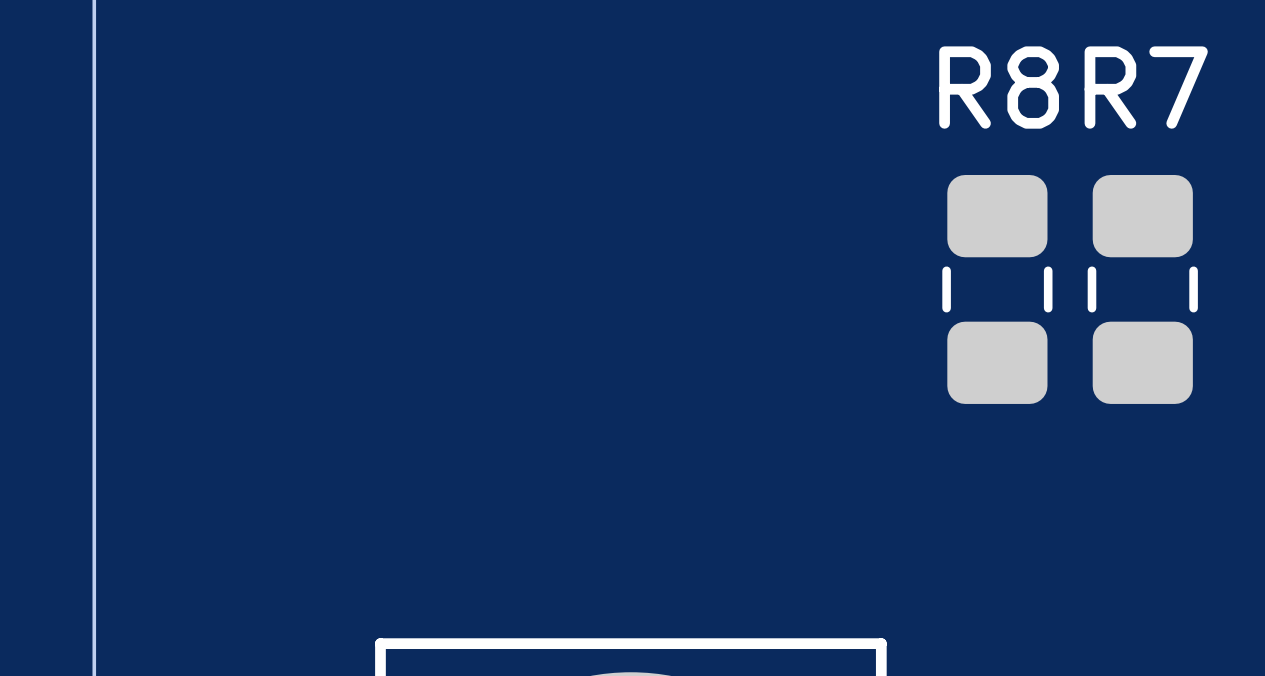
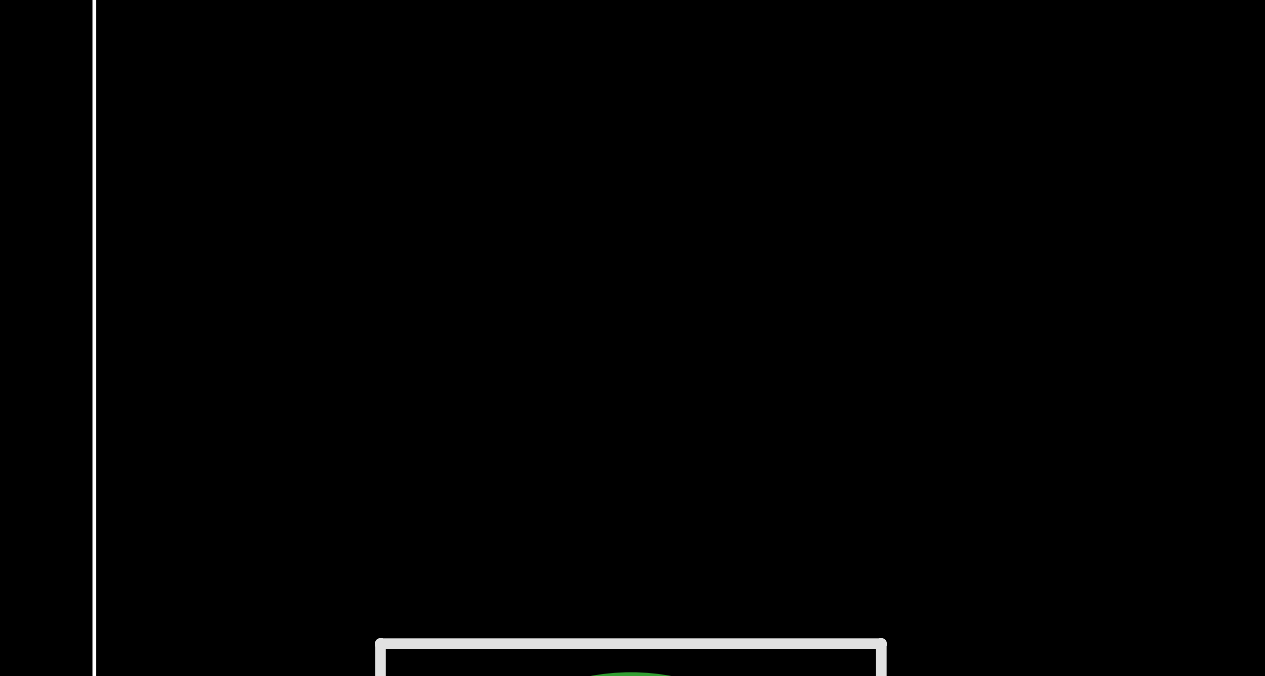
R8: (997, 289) -> none
R7: (1142, 289) -> none

